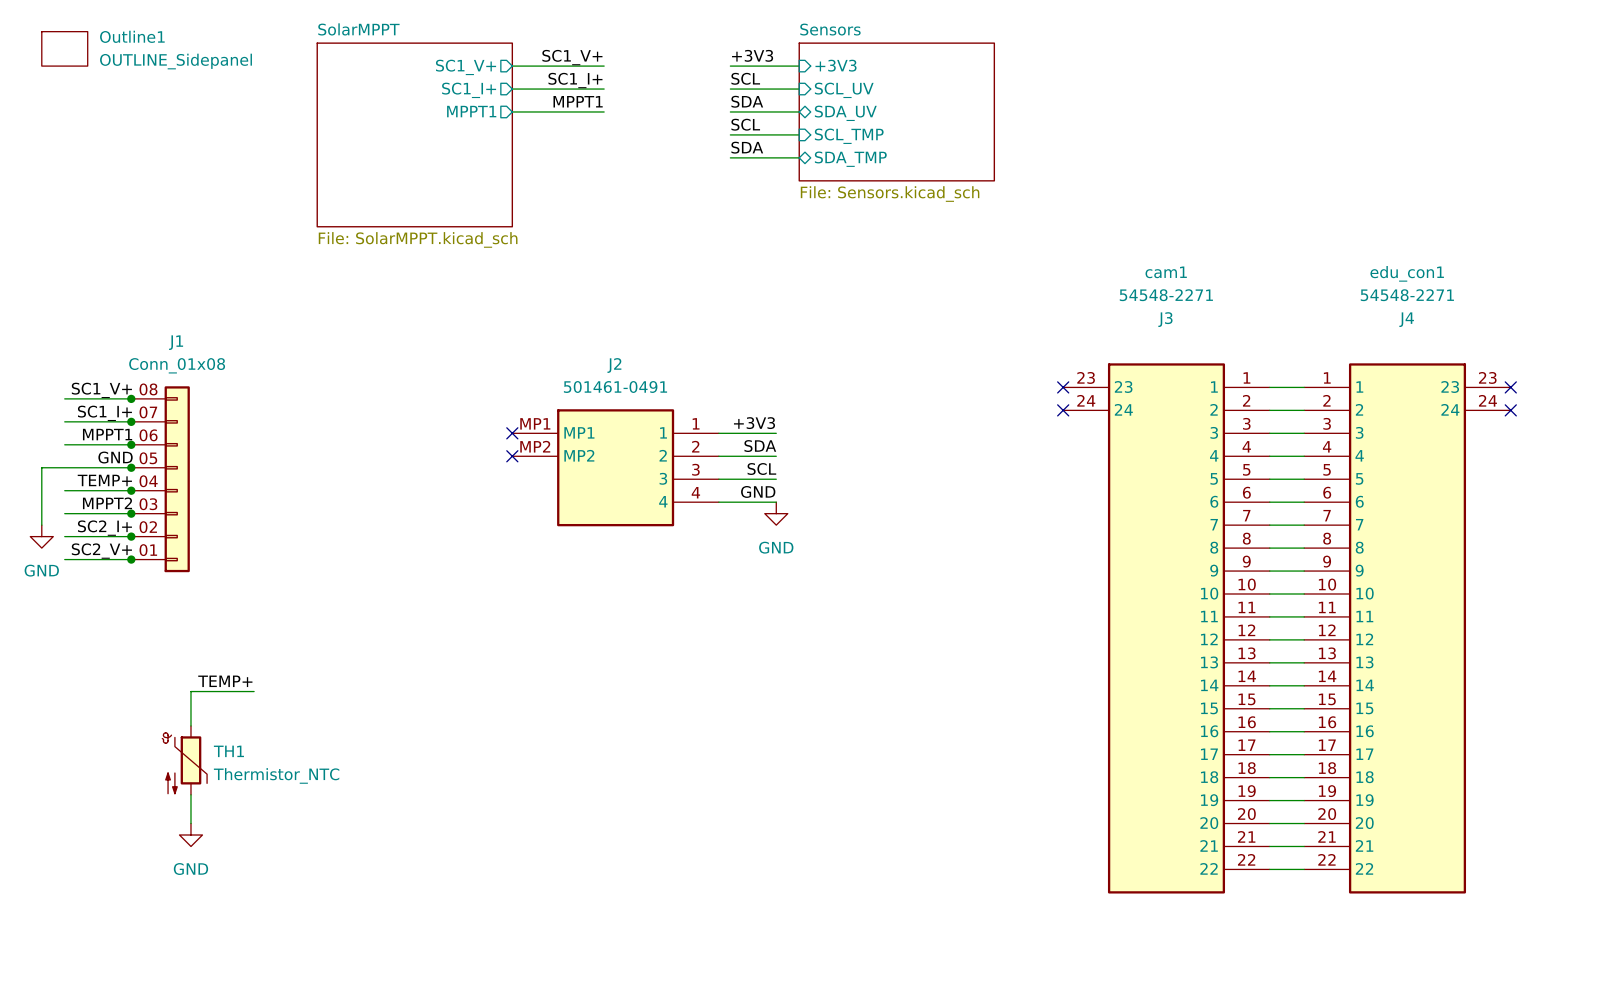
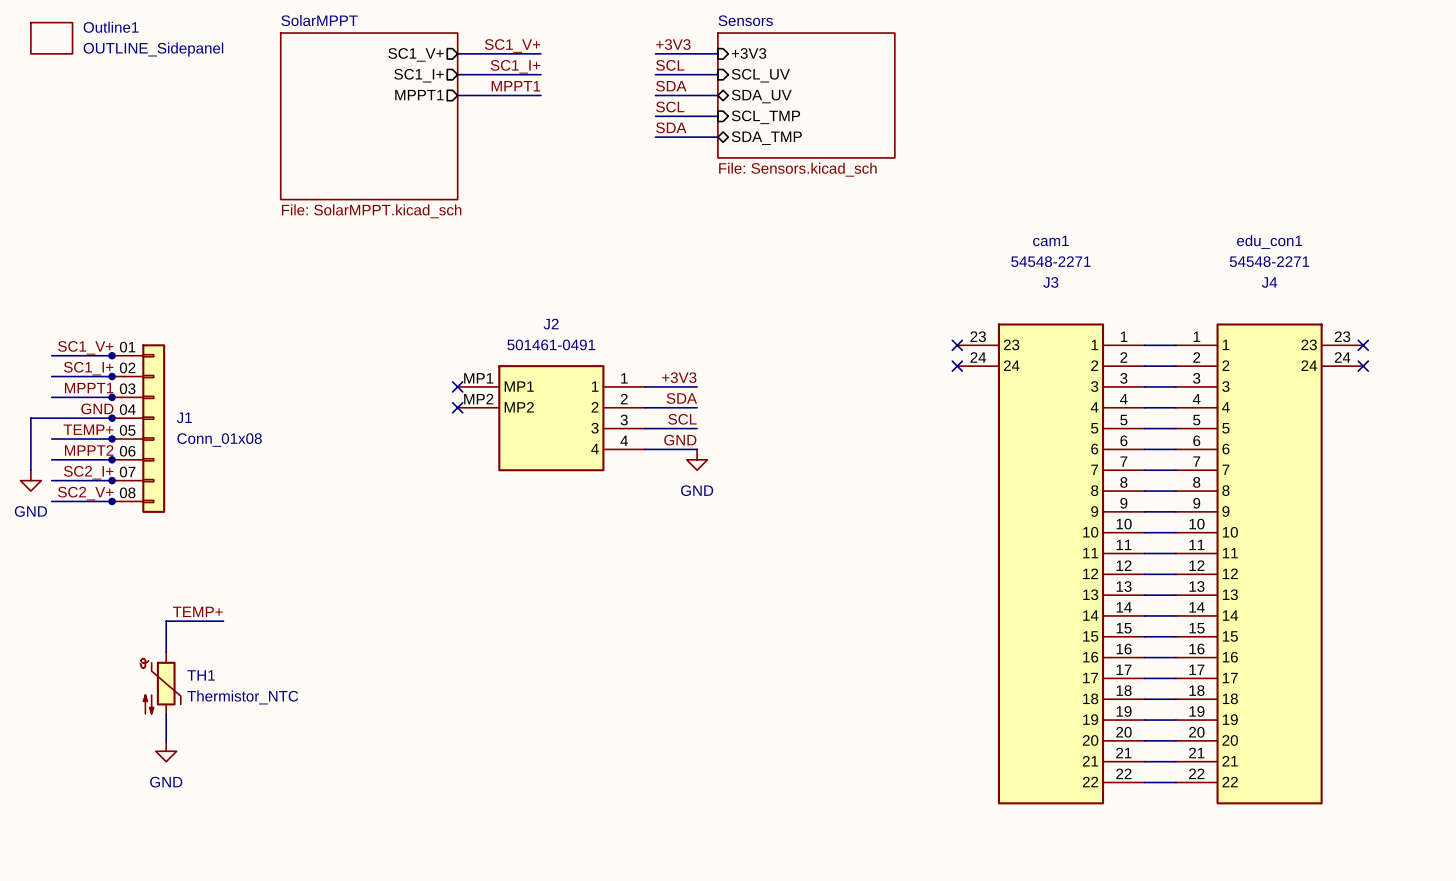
J1 name position: J1 (176, 342) -> J1 (184, 417)
J1 value position: Conn_01x08 (177, 365) -> Conn_01x08 (219, 440)
J1 flip: as is (177, 479) -> up-down (153, 428)

